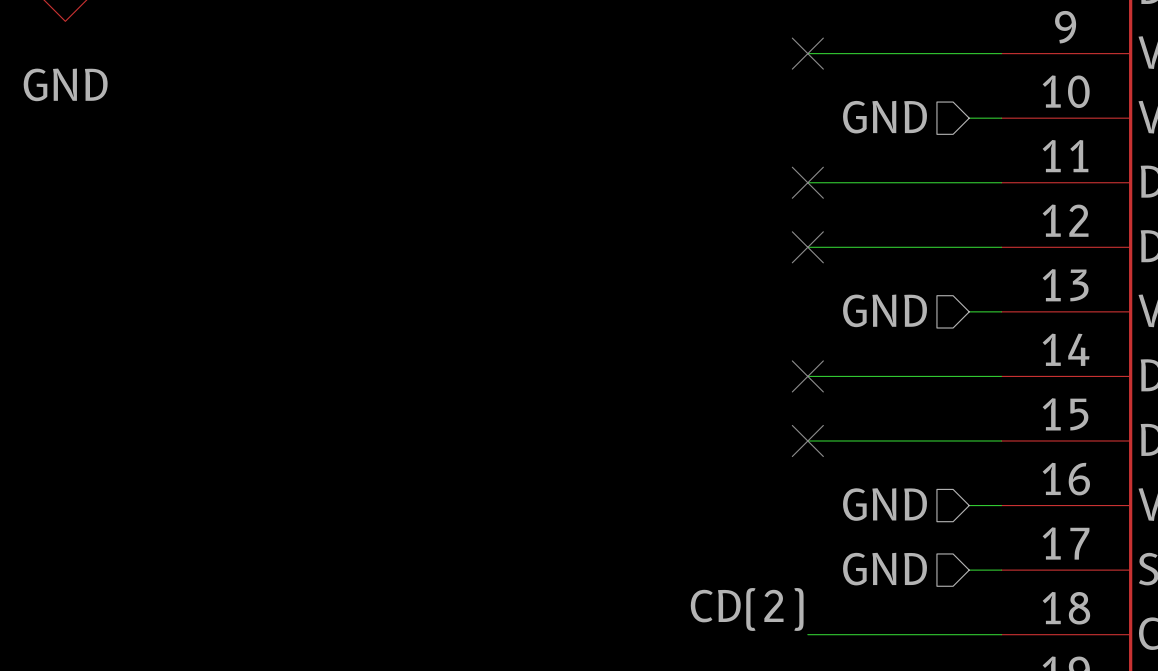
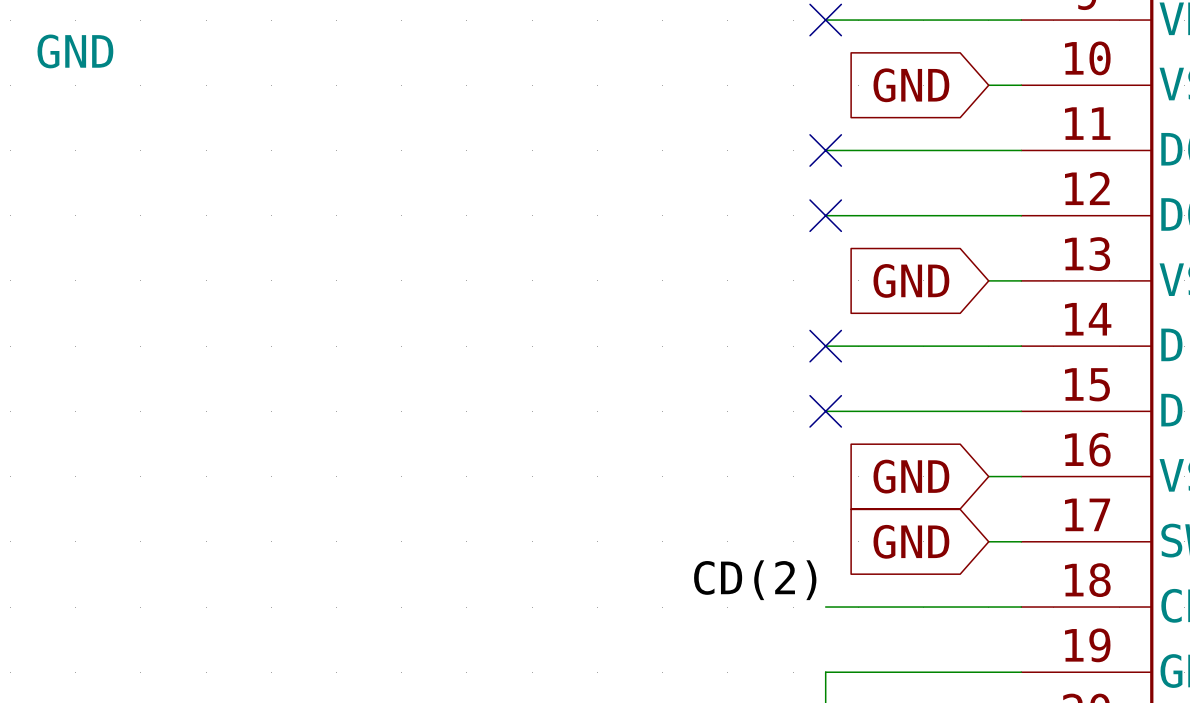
hierarchical label: GND (885, 117) -> none
global label: none -> GND (911, 85)
hierarchical label: GND (885, 310) -> none
global label: none -> GND (911, 280)
hierarchical label: GND (885, 504) -> none
global label: none -> GND (911, 476)
hierarchical label: GND (885, 569) -> none
global label: none -> GND (911, 541)

